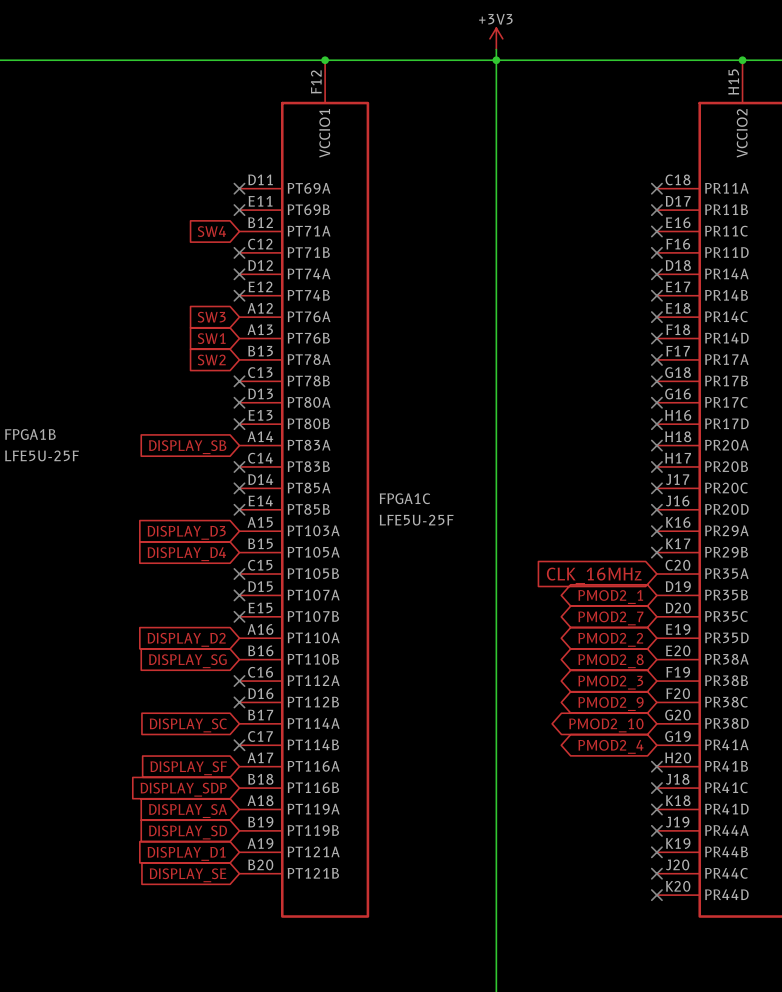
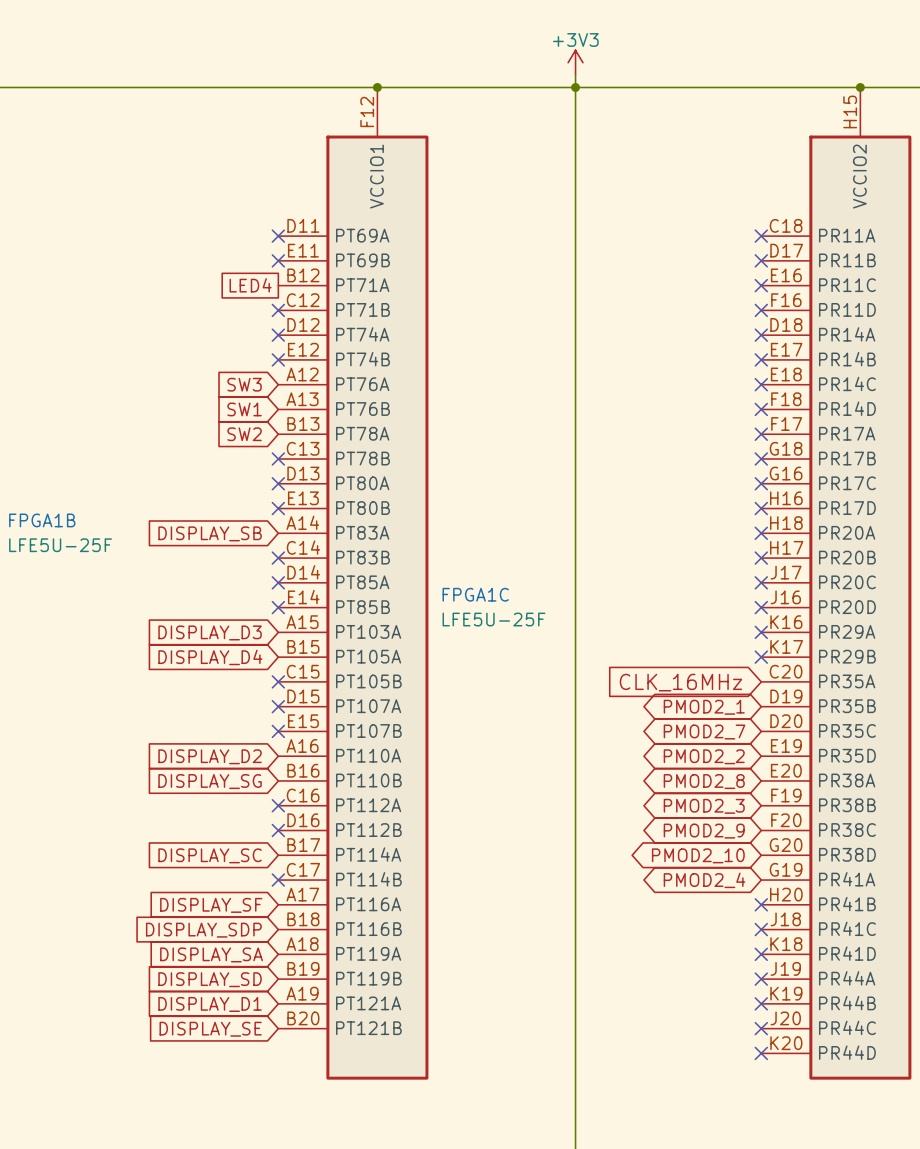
global label shape: input (211, 231) -> passive (250, 285)
global label: SW4 (211, 231) -> LED4 (250, 285)

